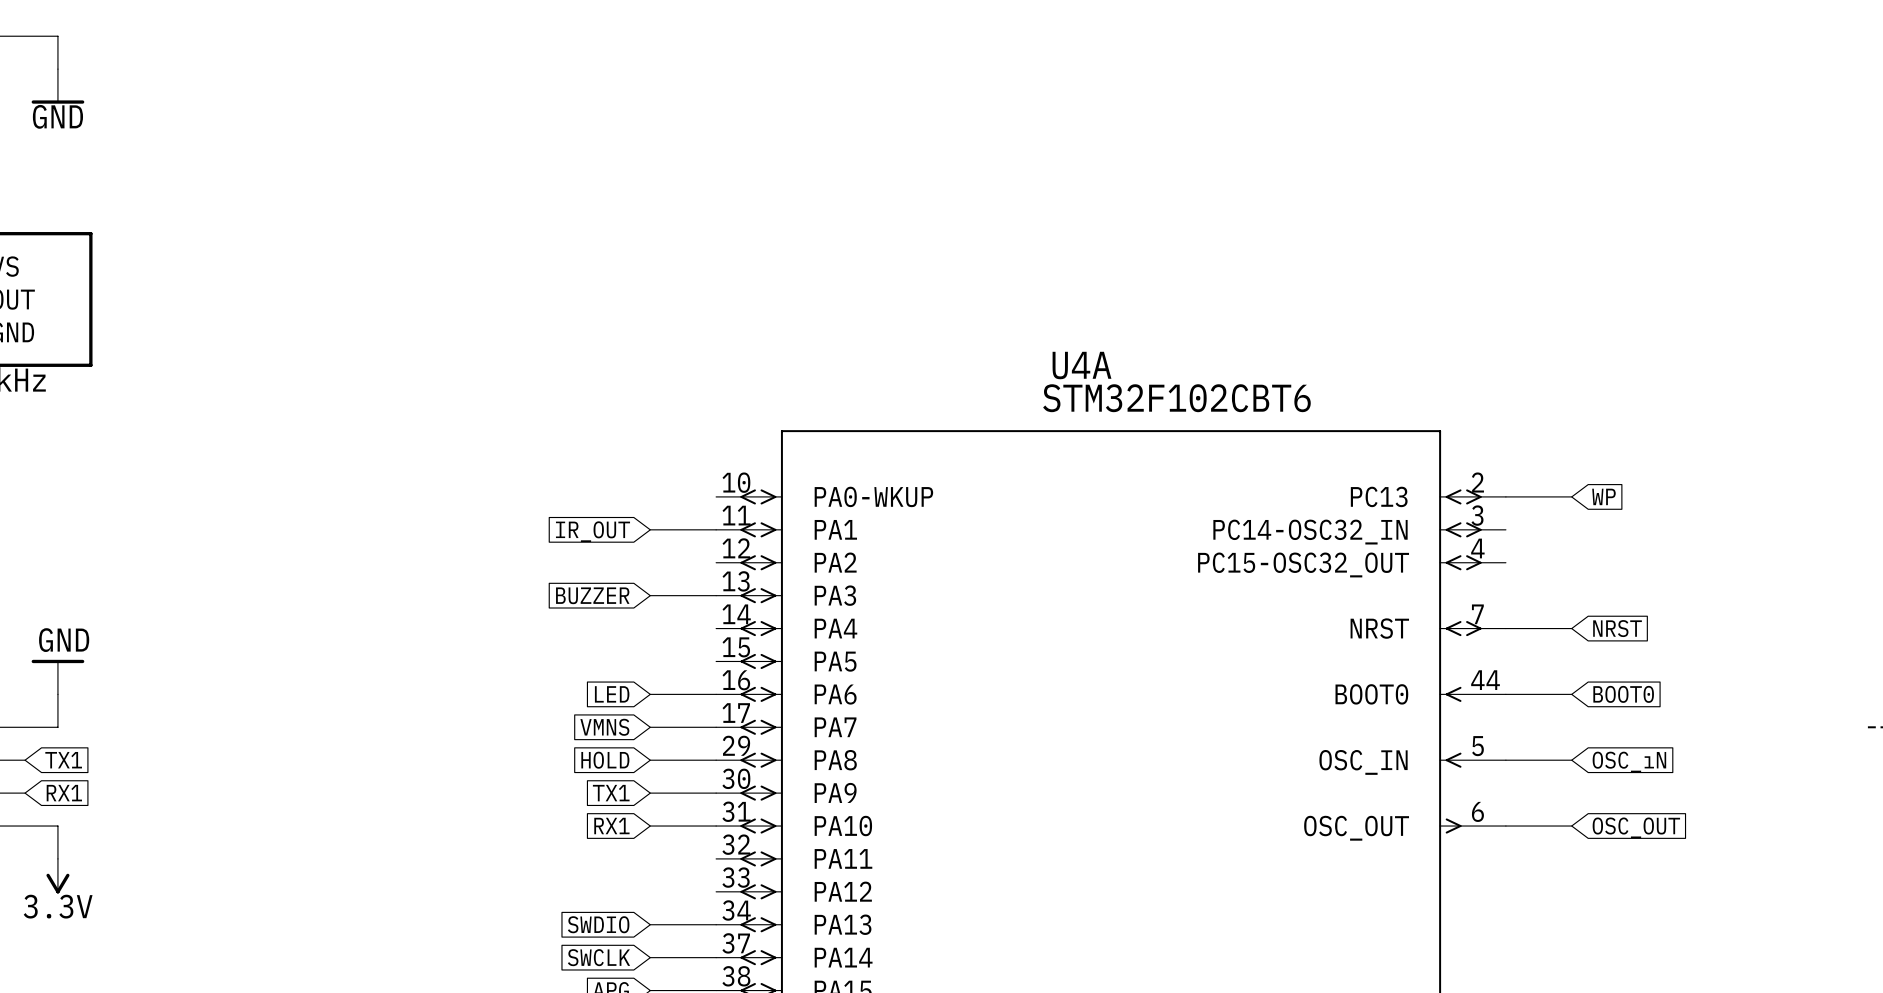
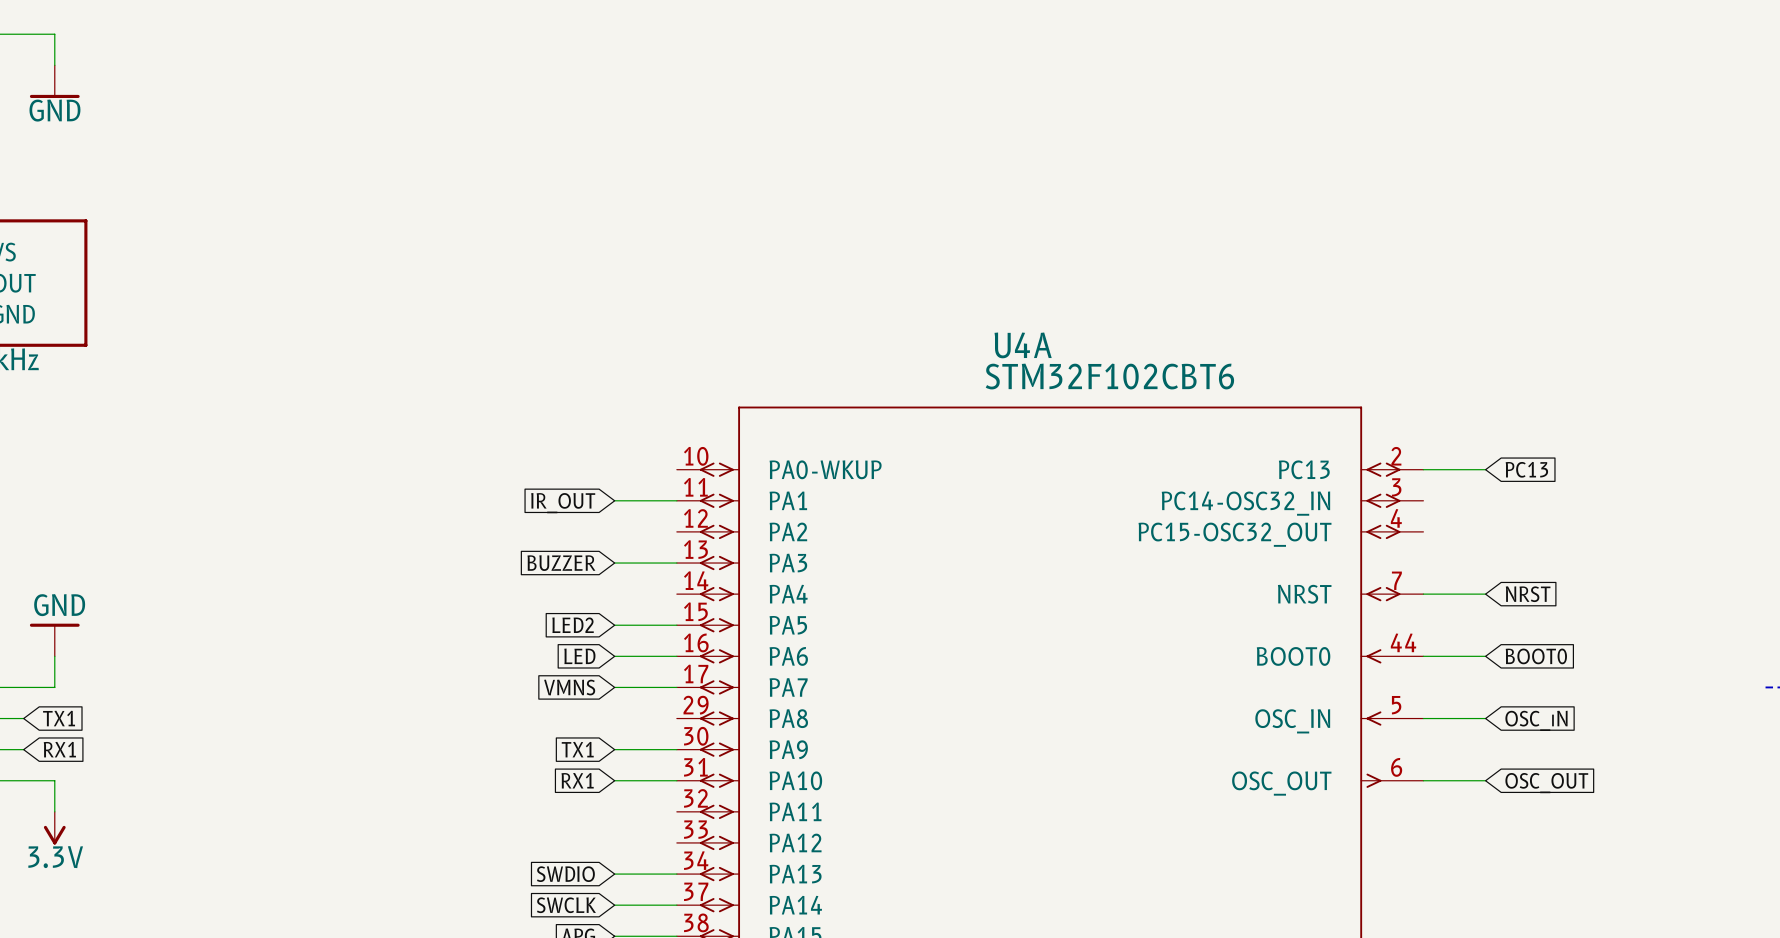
global label: WP (1603, 496) -> PC13 (1526, 469)
global label: none -> LED2 (573, 625)
global label: HOLD (605, 760) -> none
wire: (650, 760) (716, 760) -> (614, 625) (676, 625)

